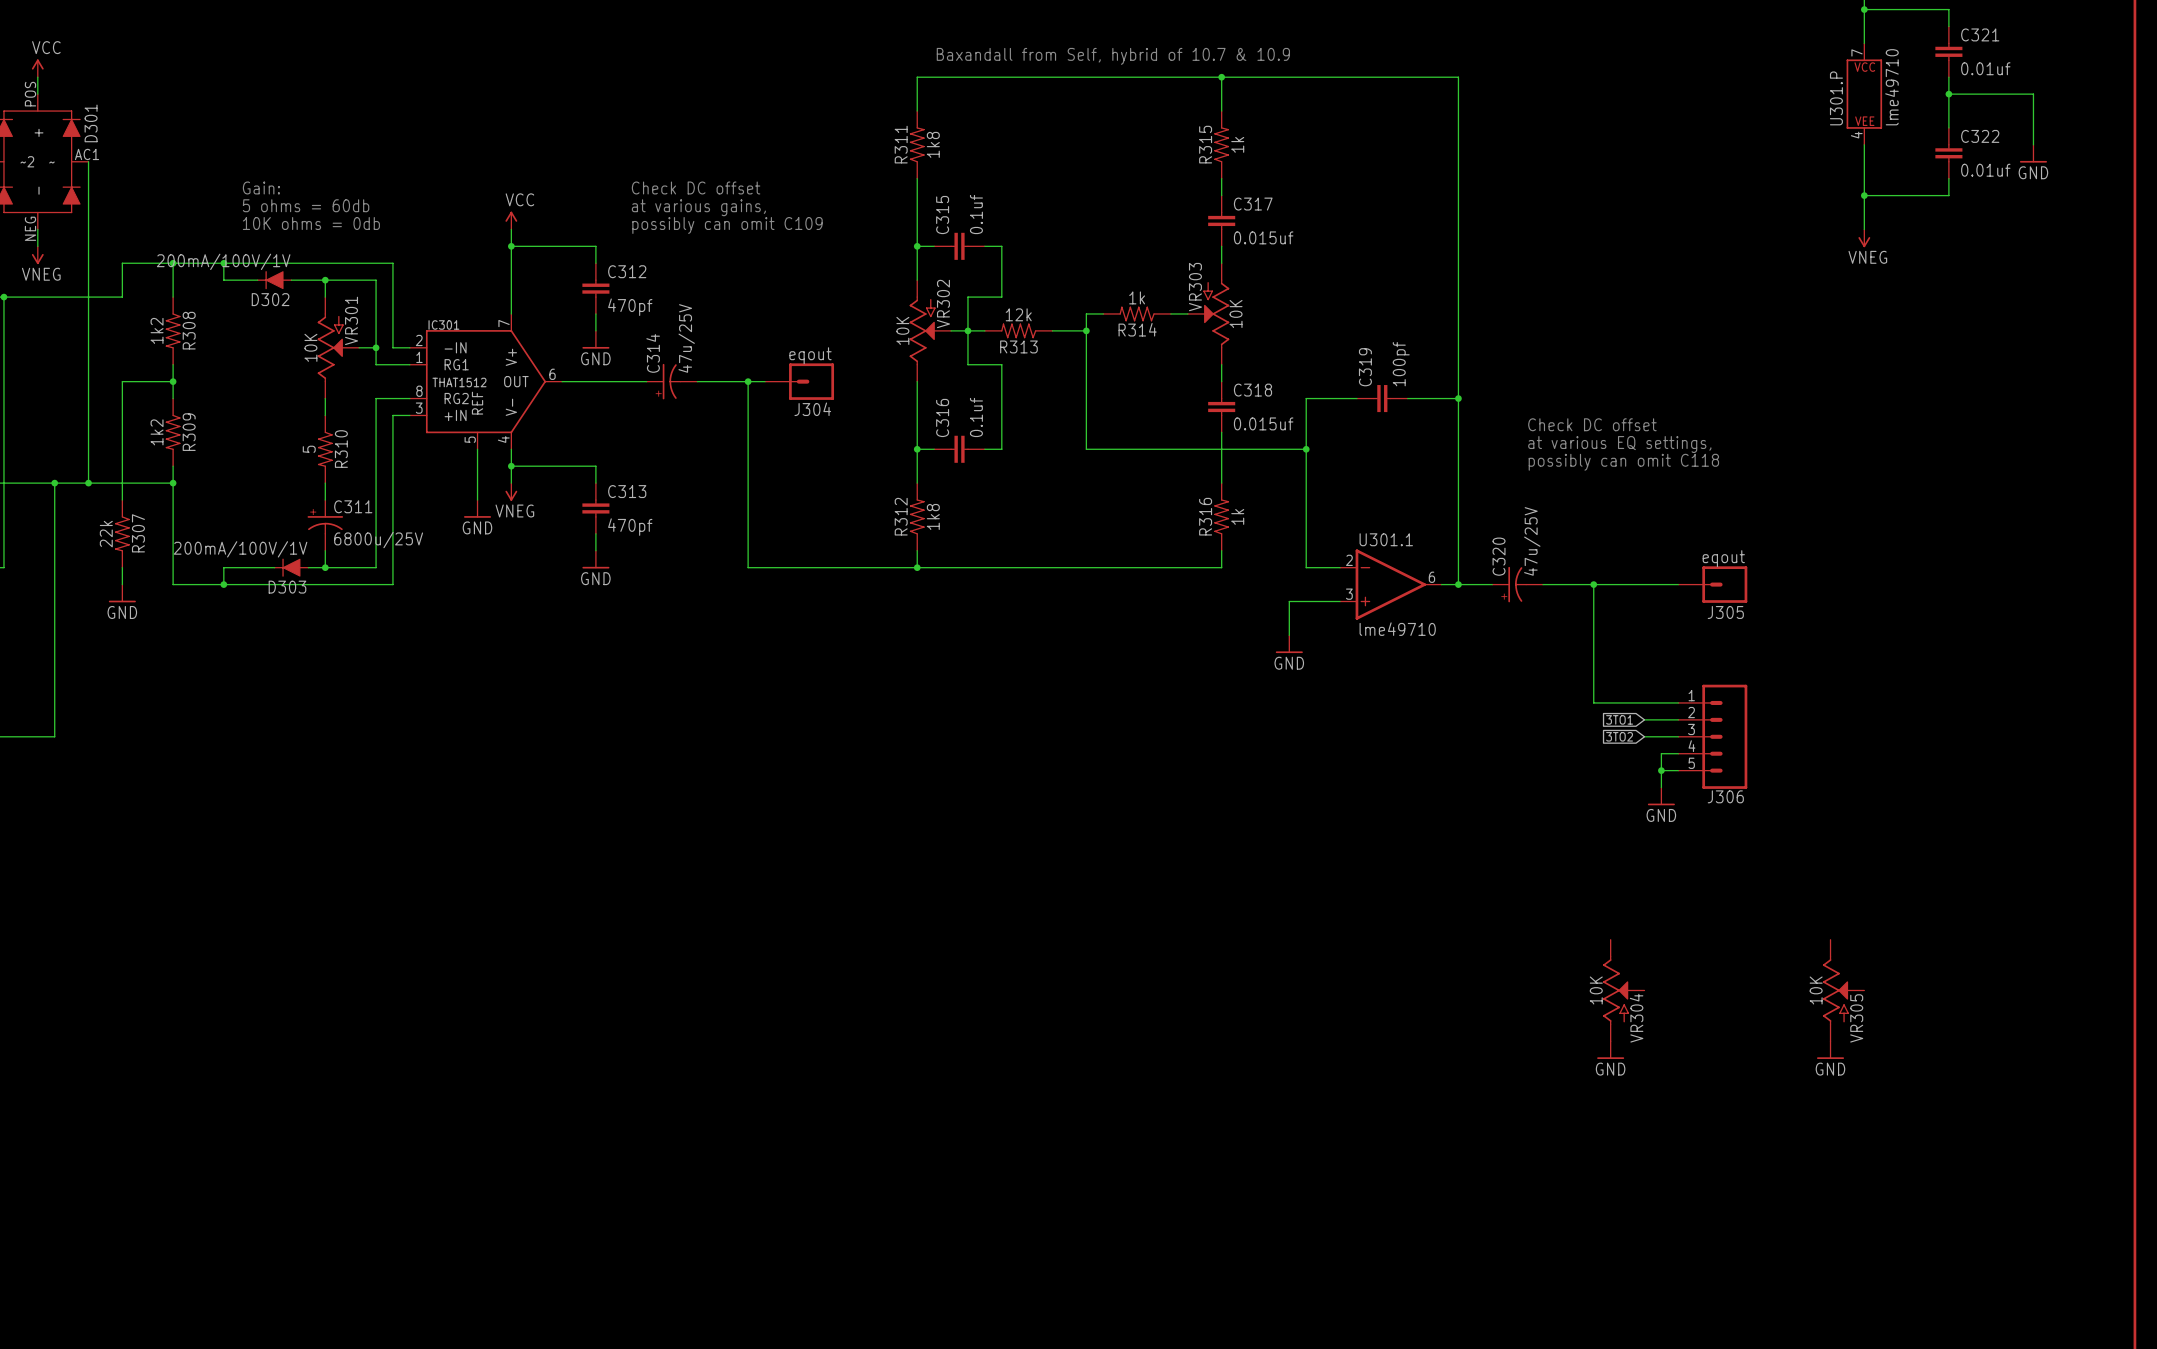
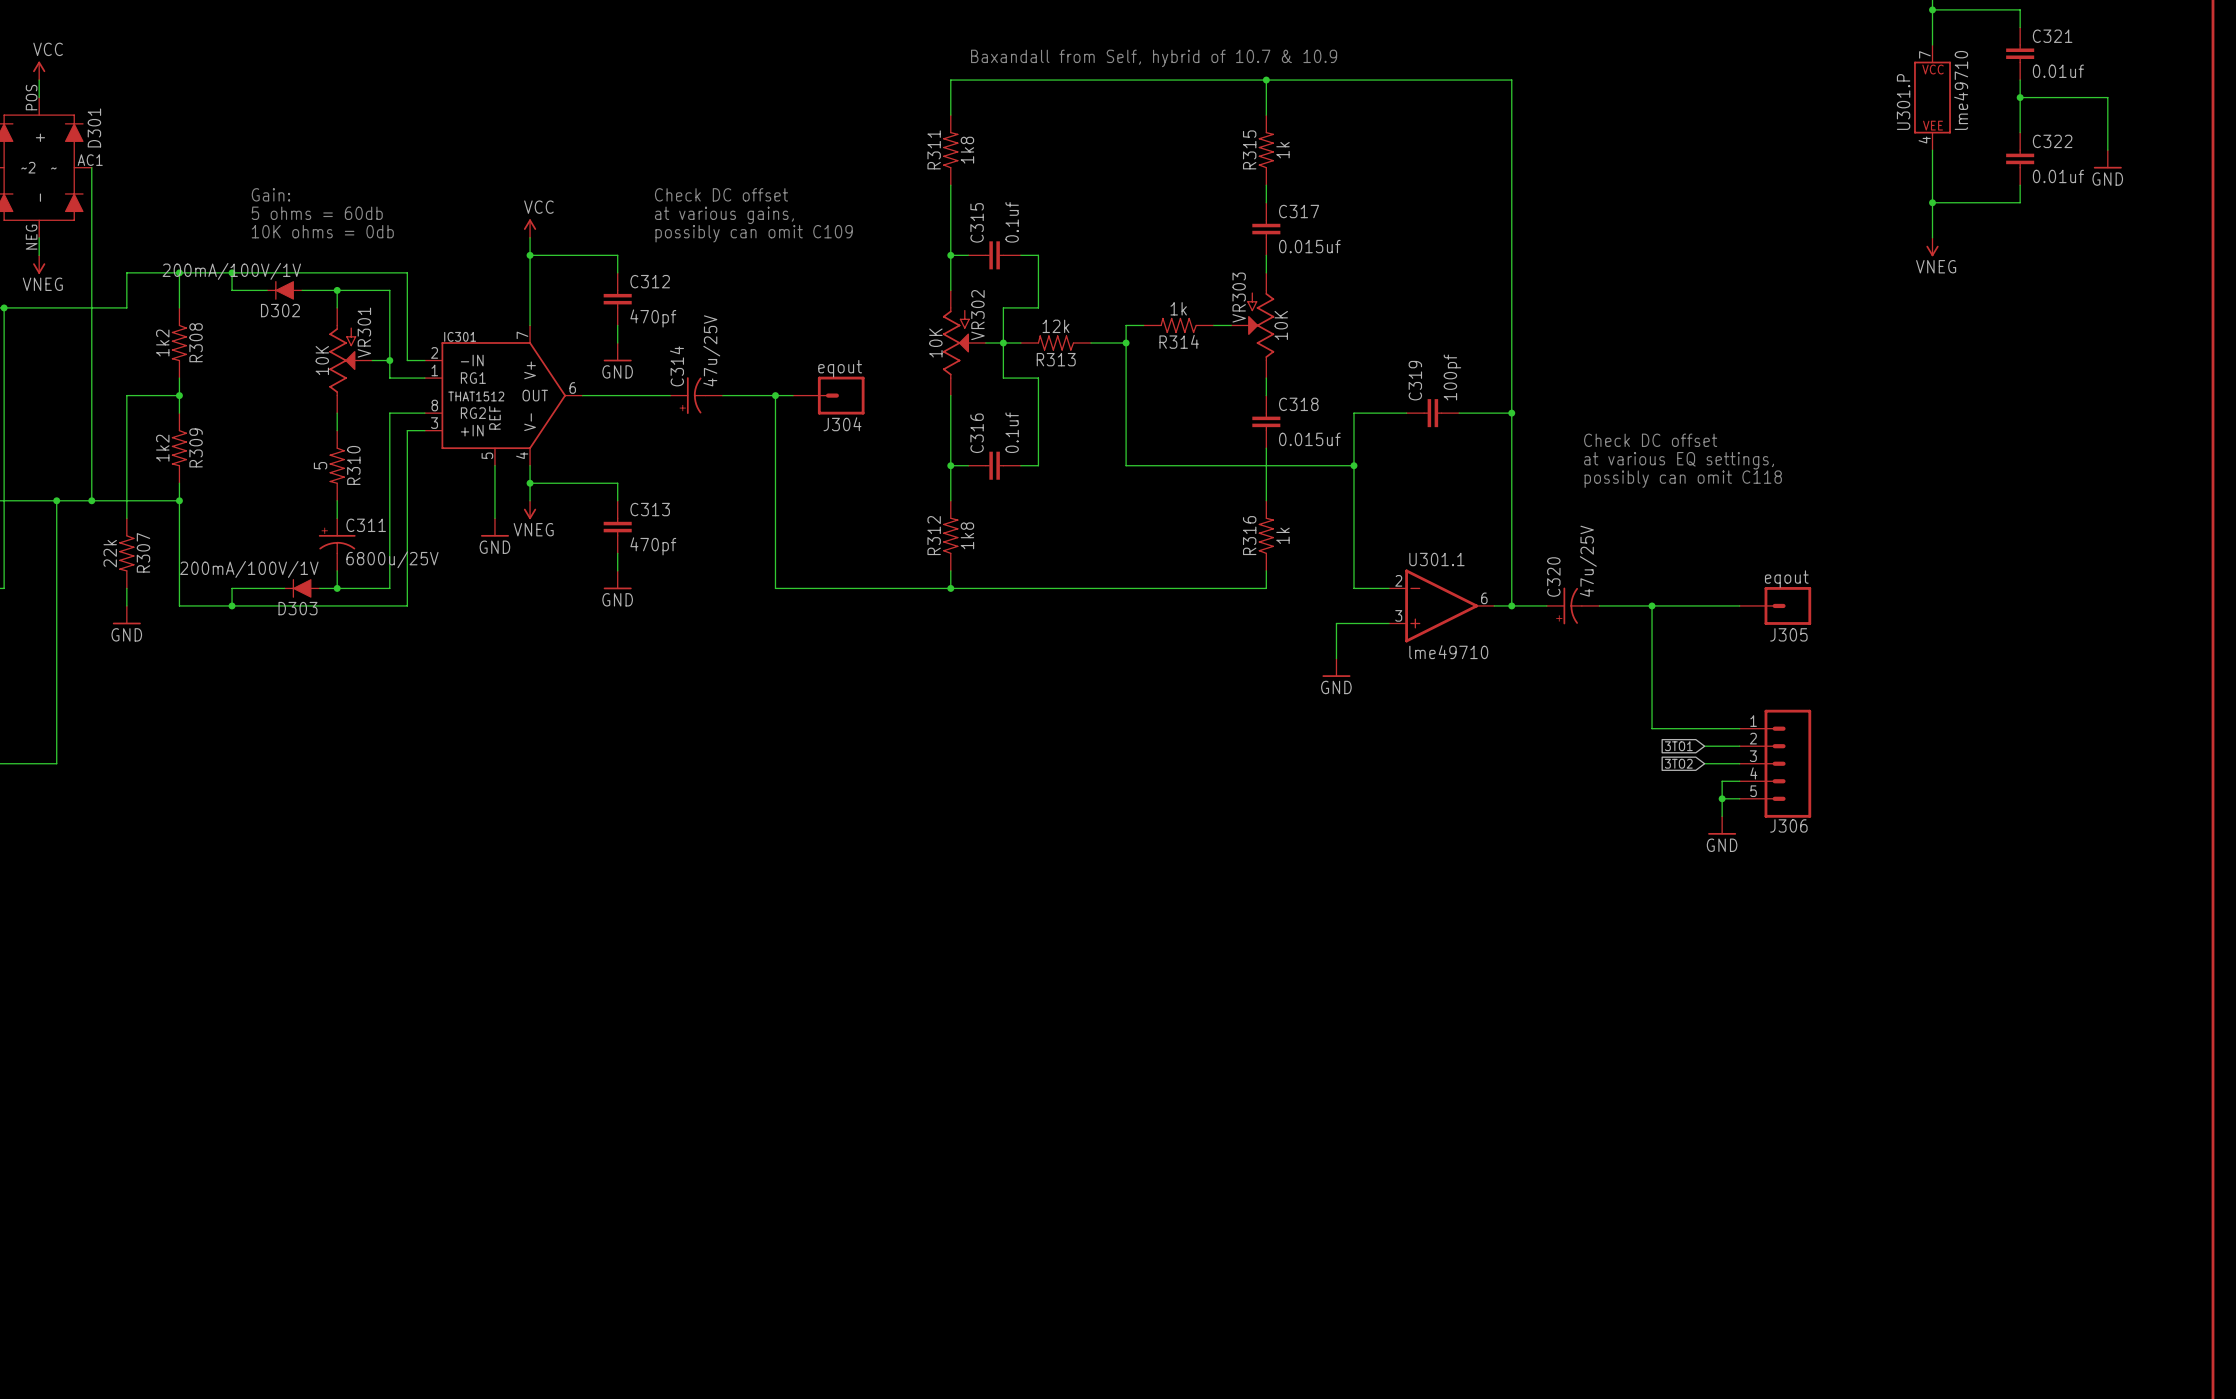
VR304: 10K (1623, 990) -> none
VR305: 10K (1843, 990) -> none
power symbol: GND (1610, 1050) -> none
power symbol: GND (1830, 1050) -> none

